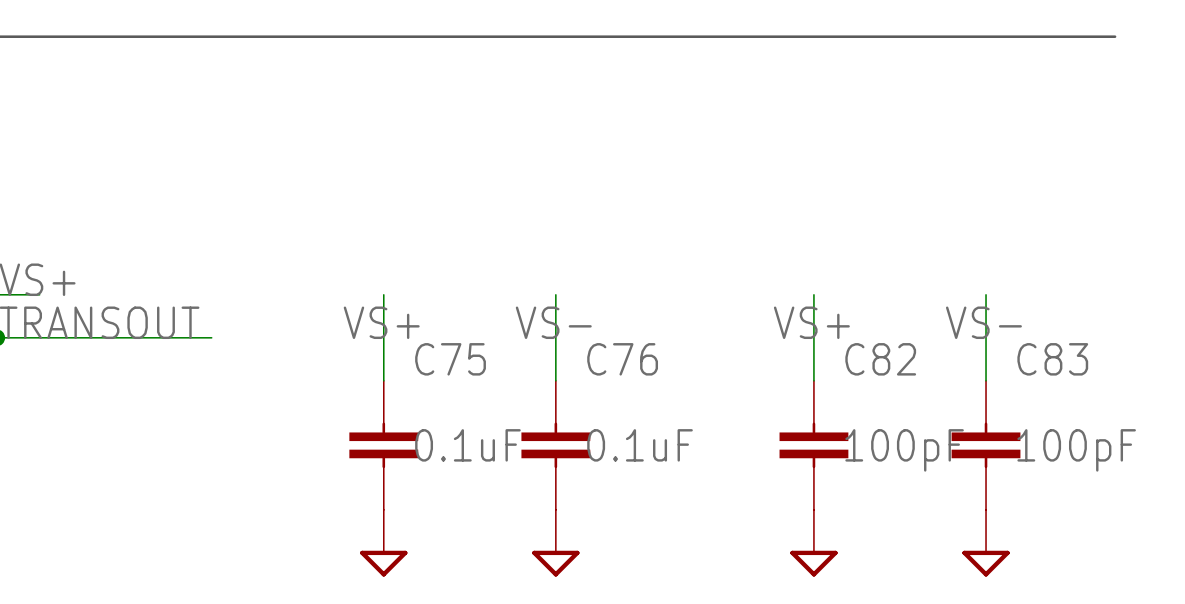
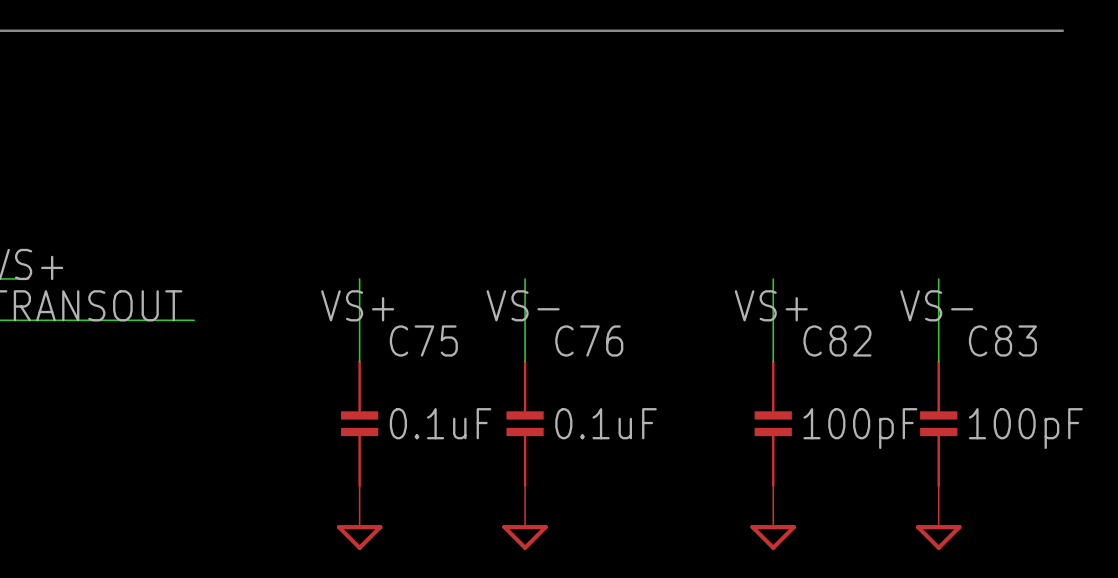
C75 symbol: [349, 380, 419, 510] -> [341, 360, 379, 487]
C76 symbol: [521, 380, 591, 510] -> [506, 360, 544, 487]
C82 symbol: [779, 380, 849, 510] -> [754, 360, 792, 487]
C83 symbol: [951, 380, 1021, 510] -> [920, 360, 958, 487]

